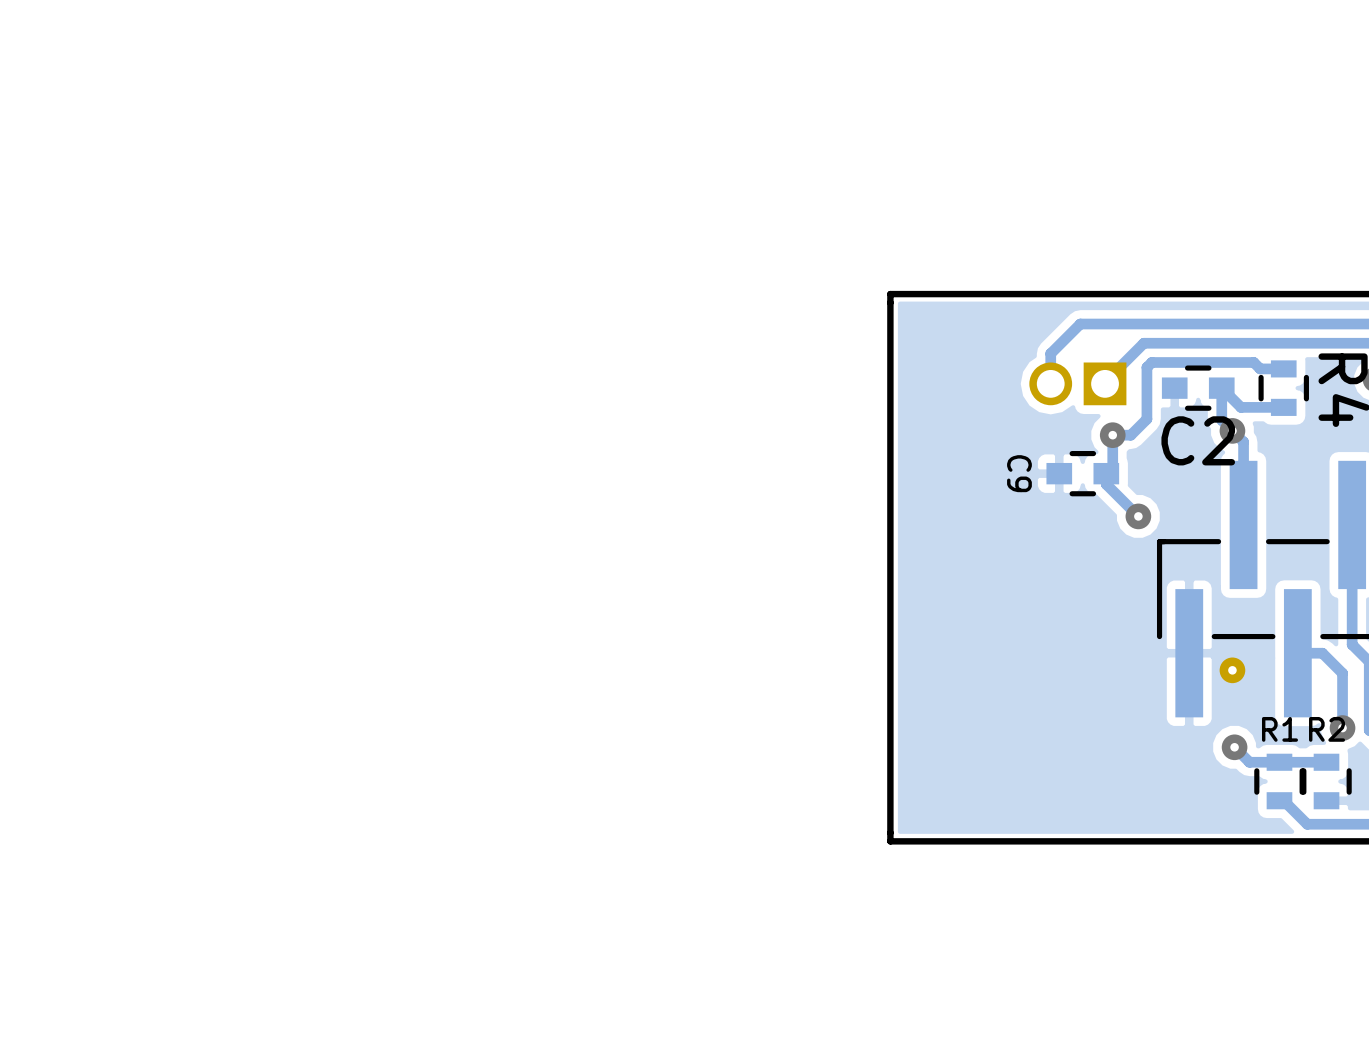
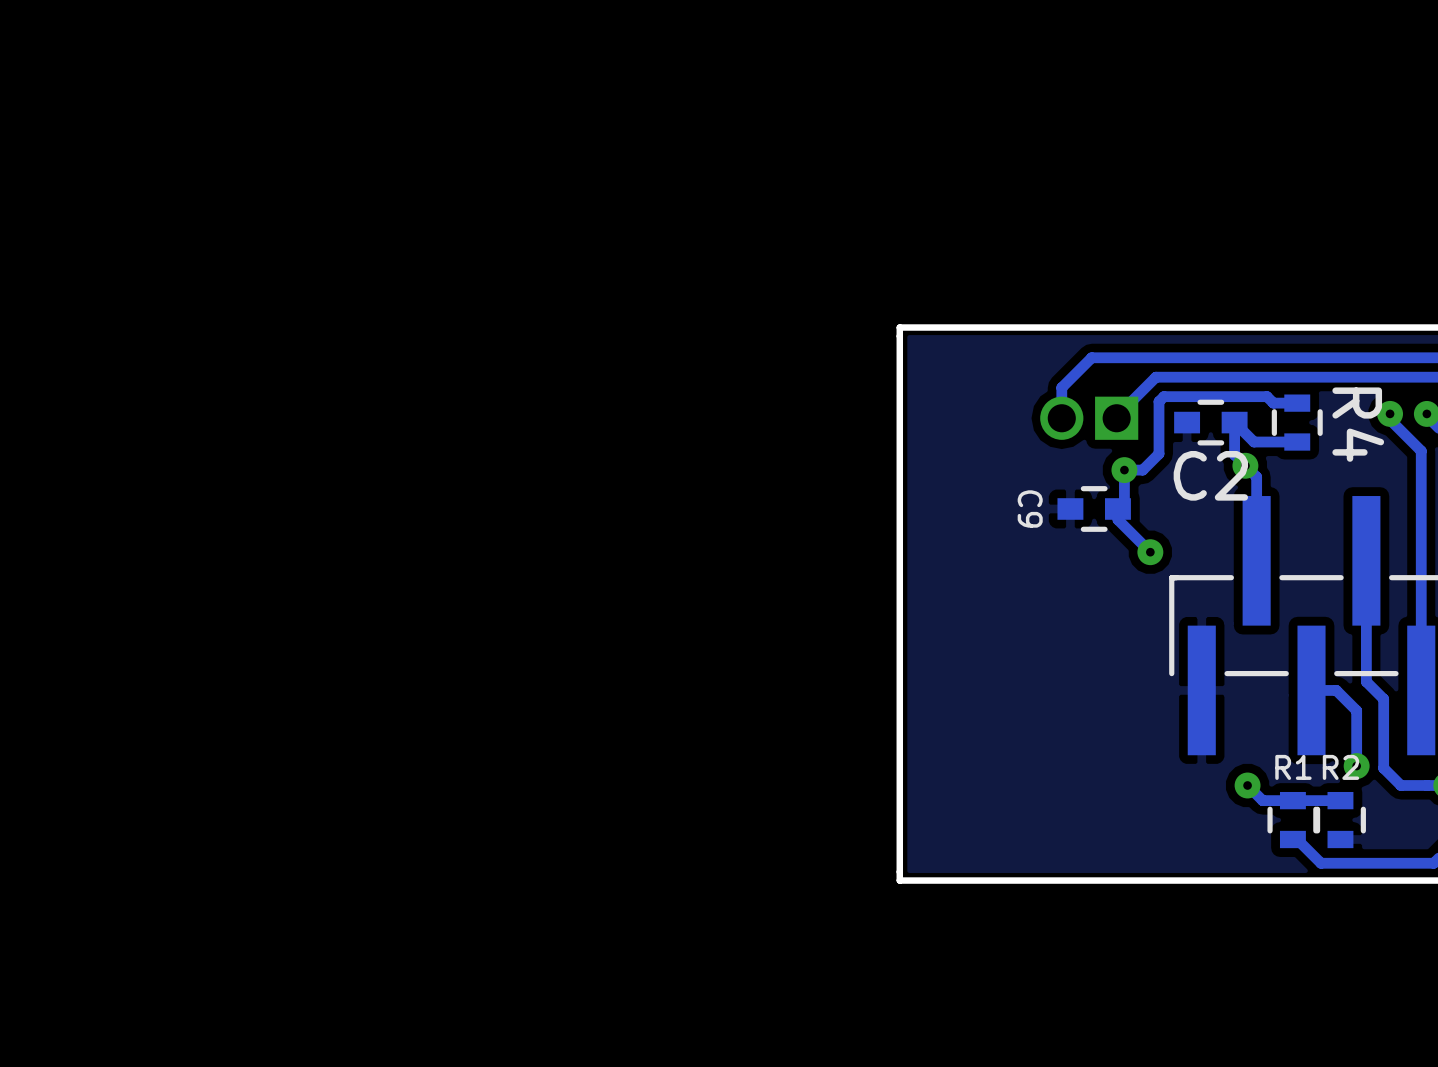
part: (1232, 670) -> none

